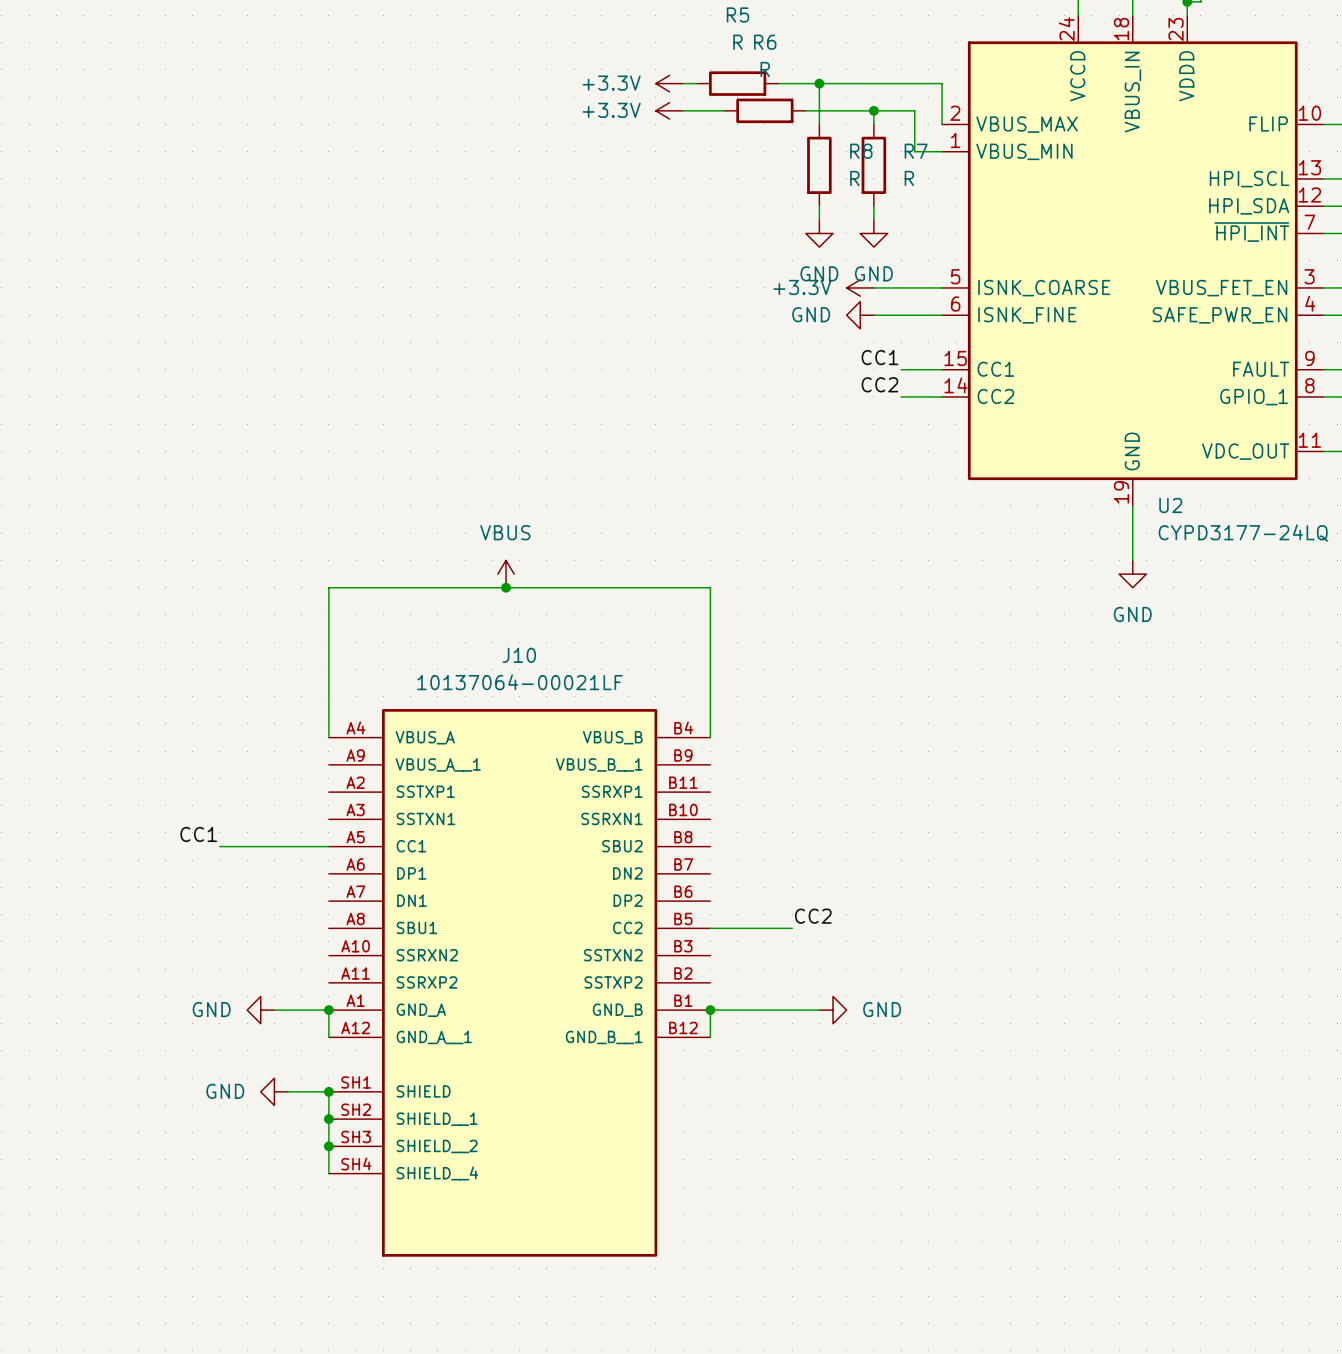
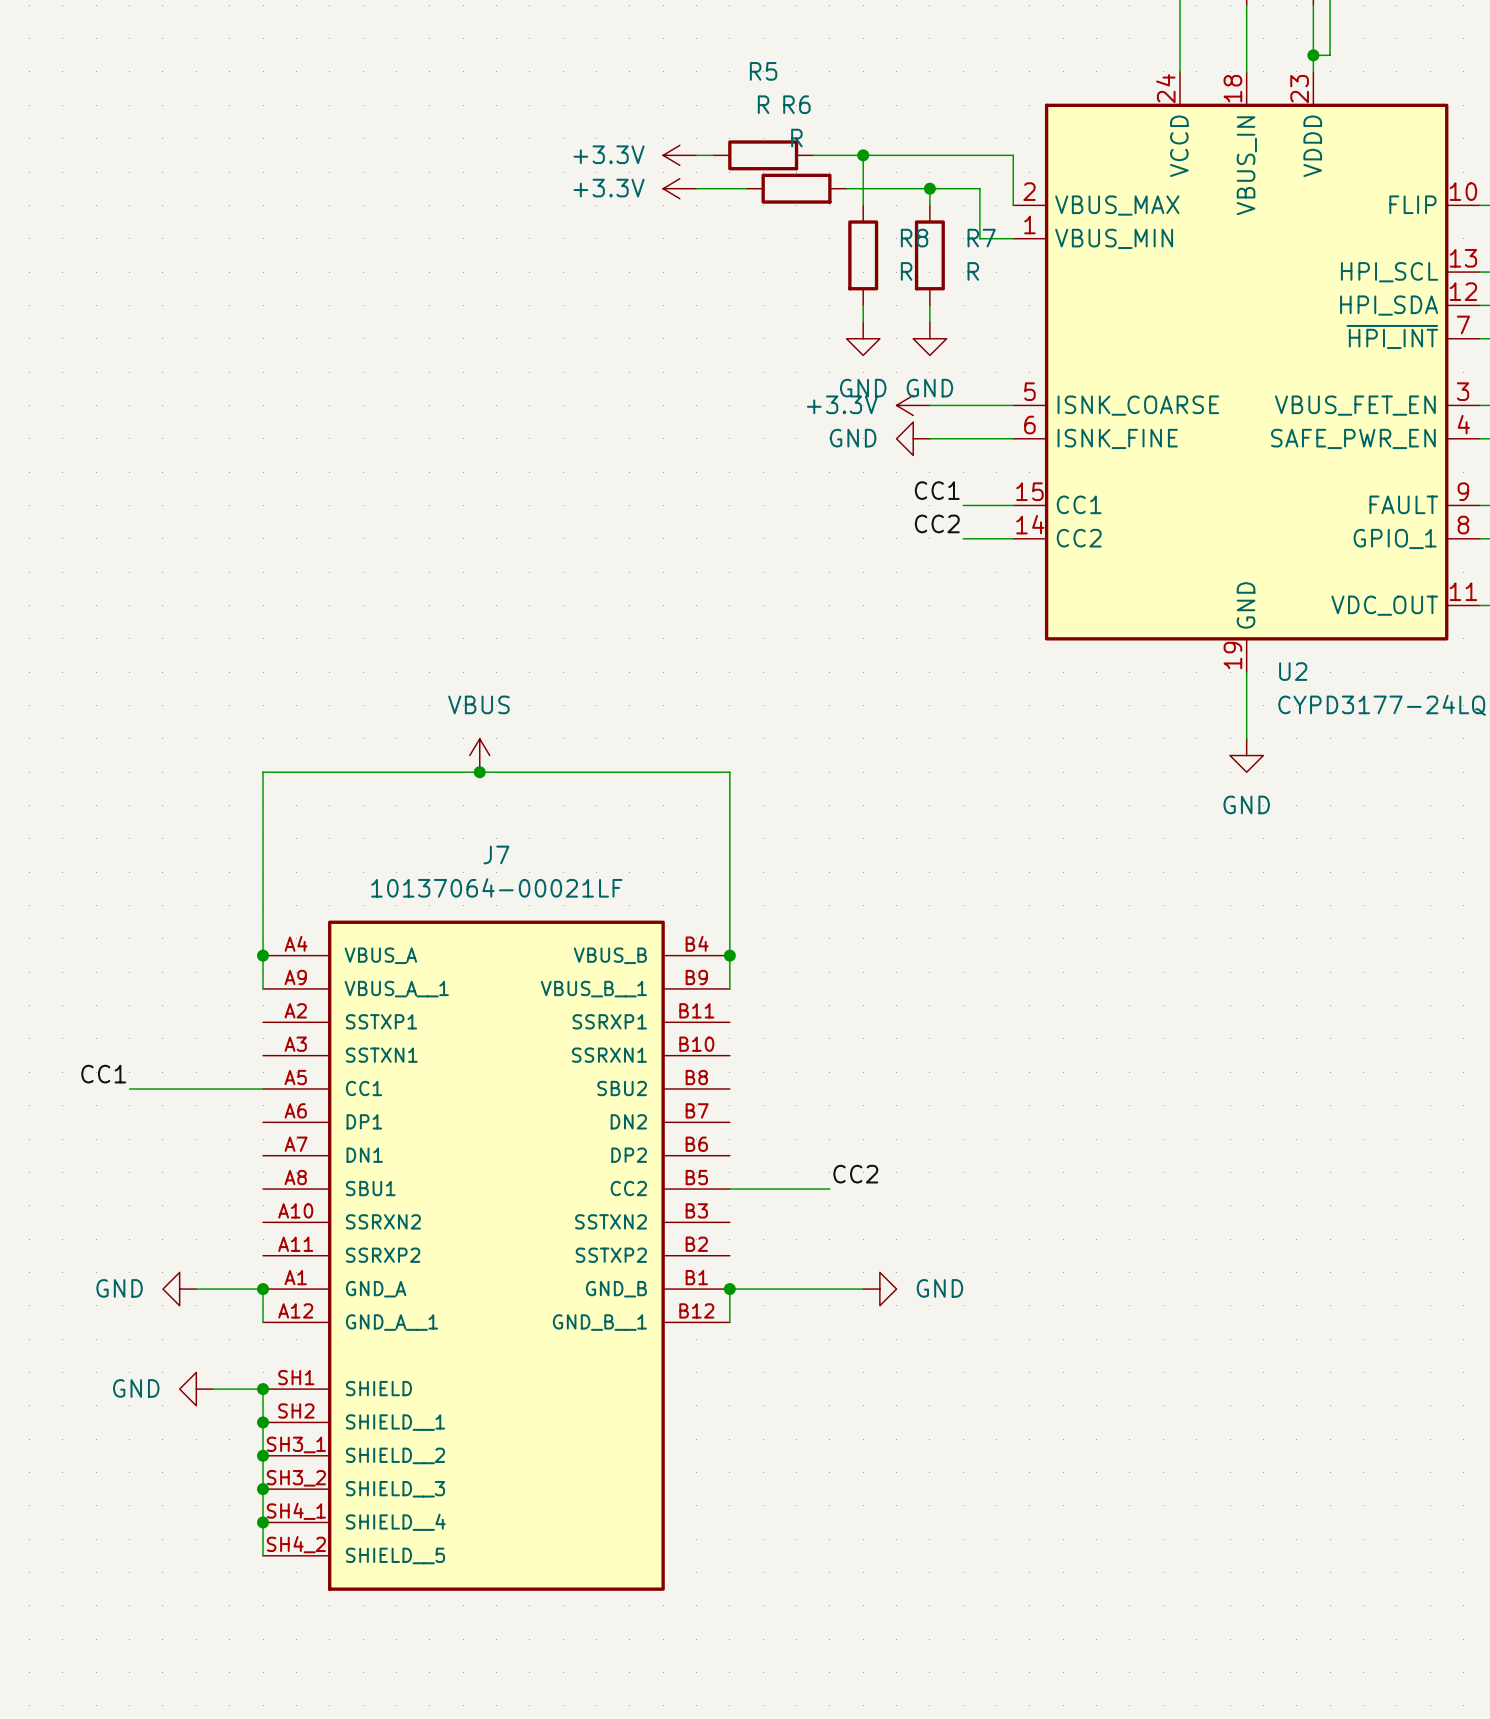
wire: none -> (263, 955) (263, 988)
junction: none -> (263, 955)
wire: none -> (729, 955) (729, 988)
junction: none -> (729, 955)
J10: 10137064-00021LF (519, 982) -> none
J7: none -> 10137064-00021LF (496, 1255)
wire: none -> (263, 1489) (263, 1555)
junction: none -> (263, 1489)
junction: none -> (263, 1522)

